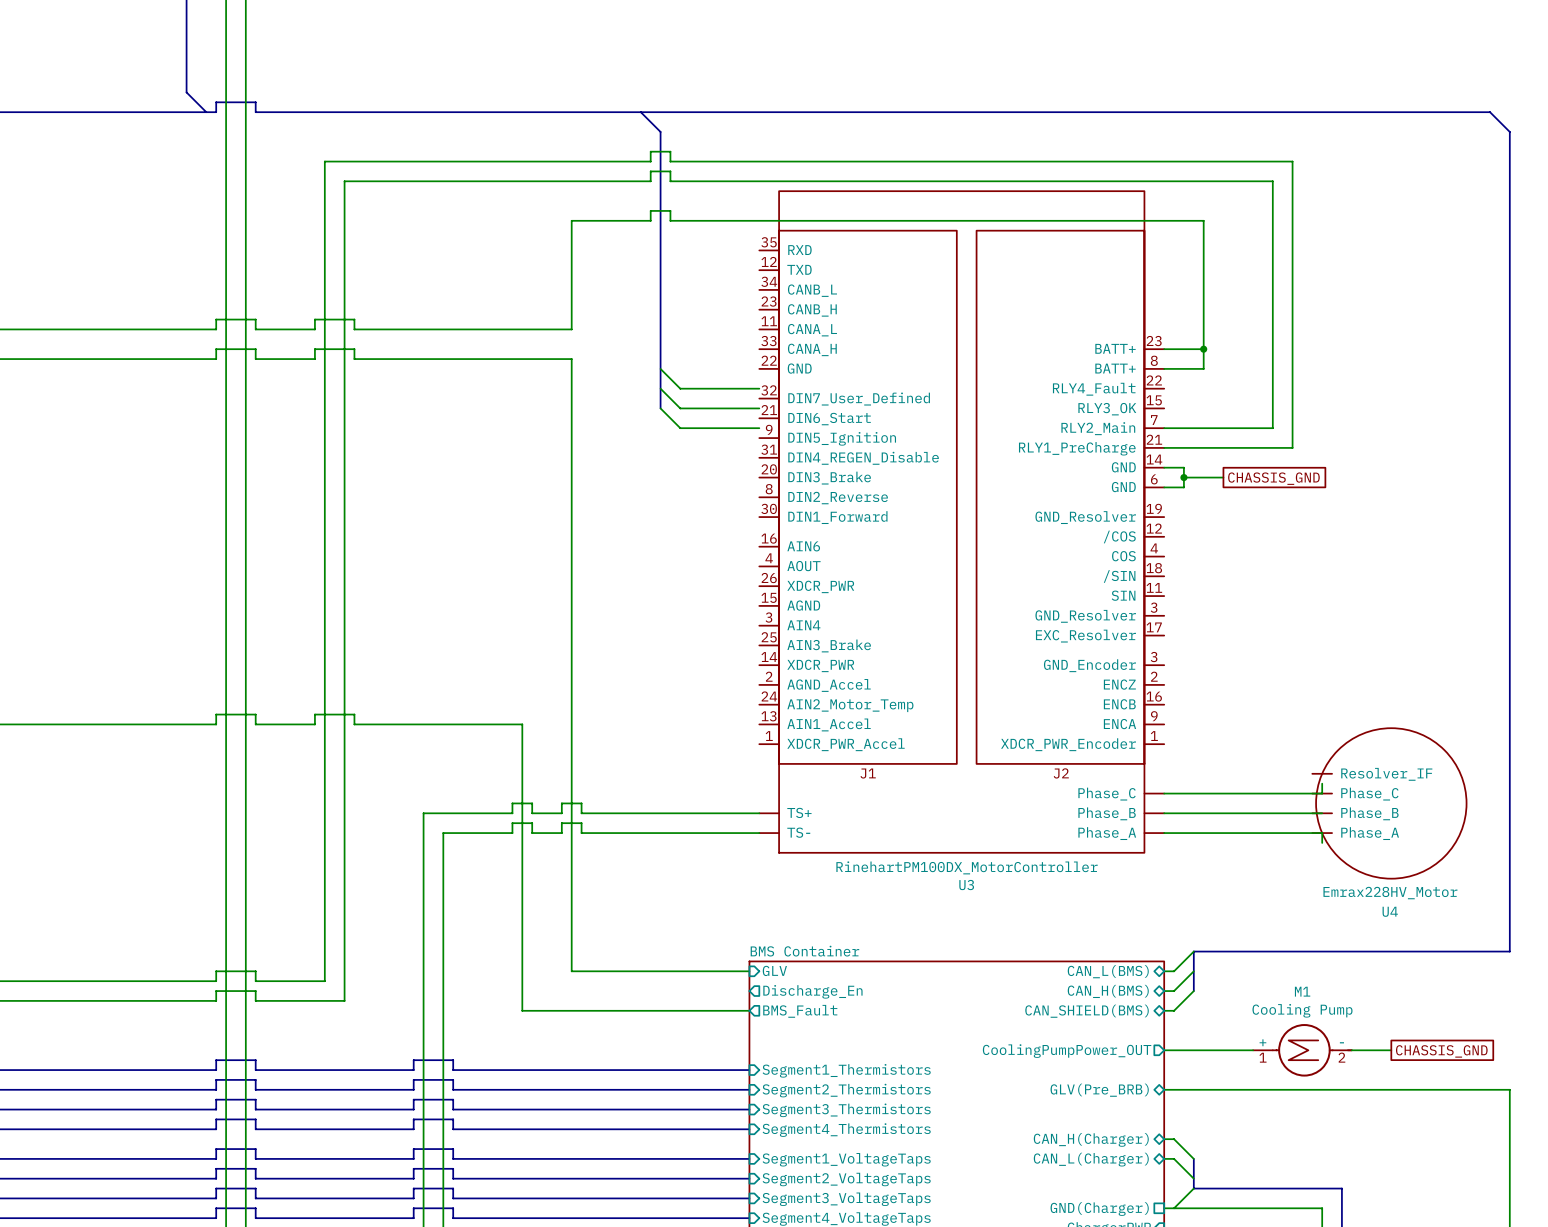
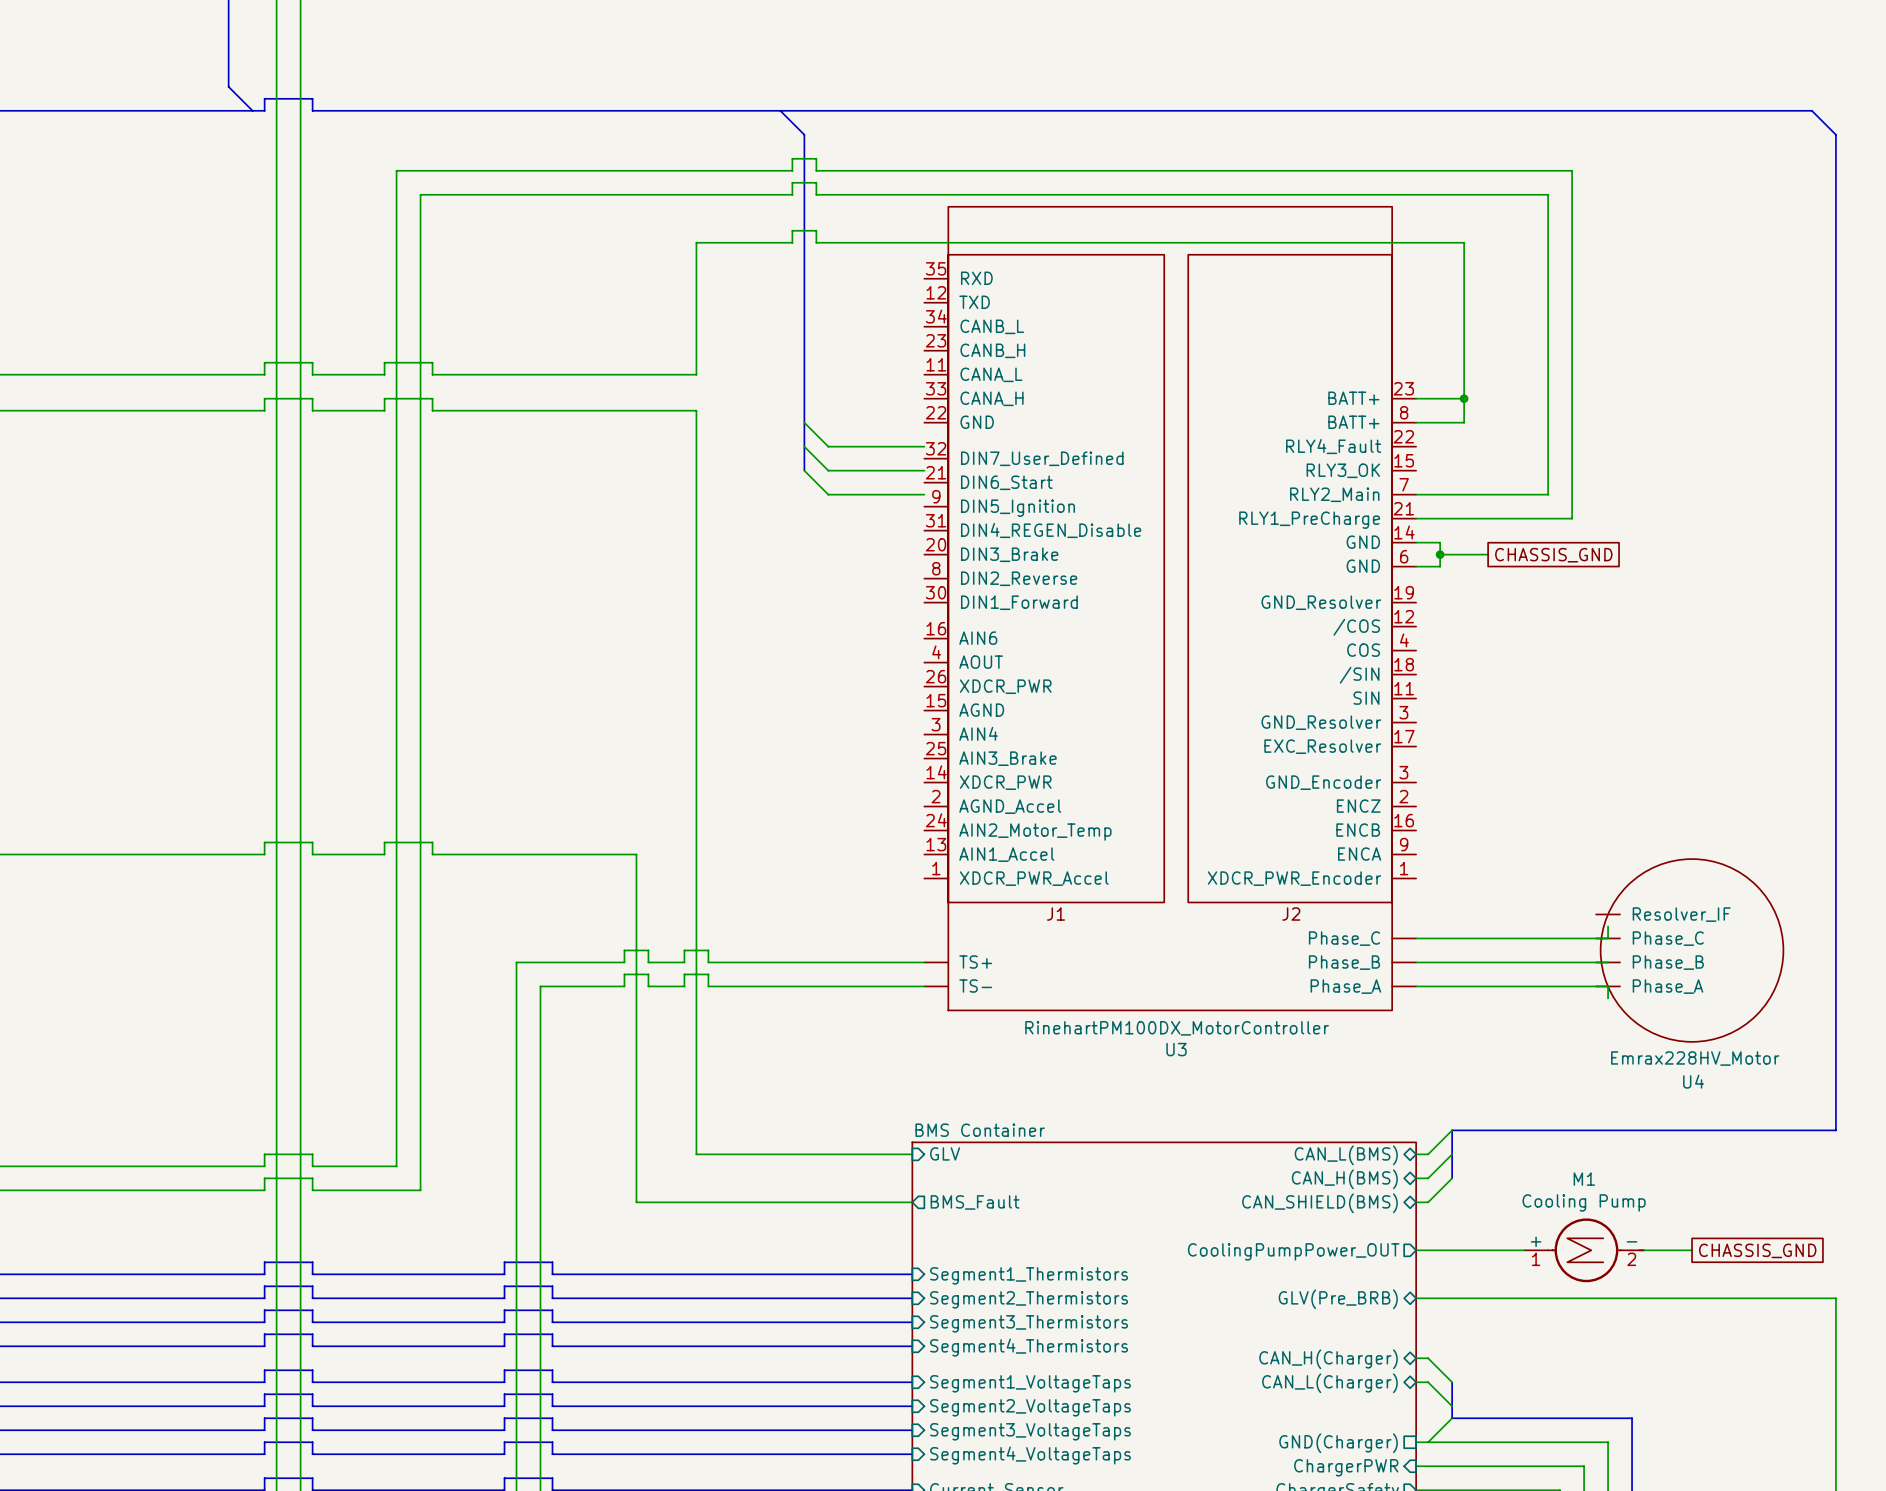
sheet pin: Discharge_En (812, 991) -> none

